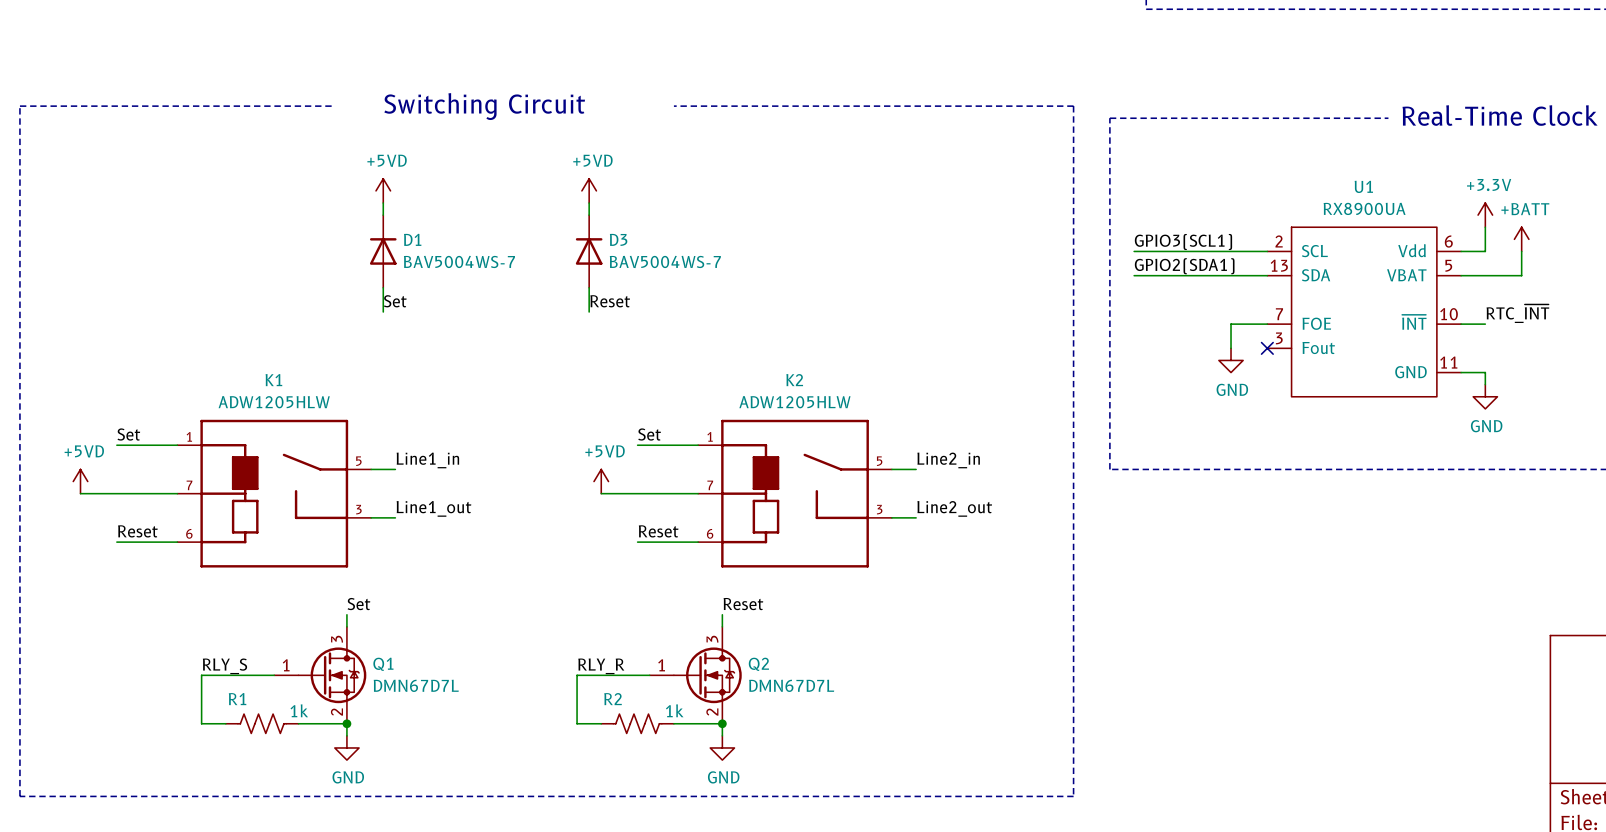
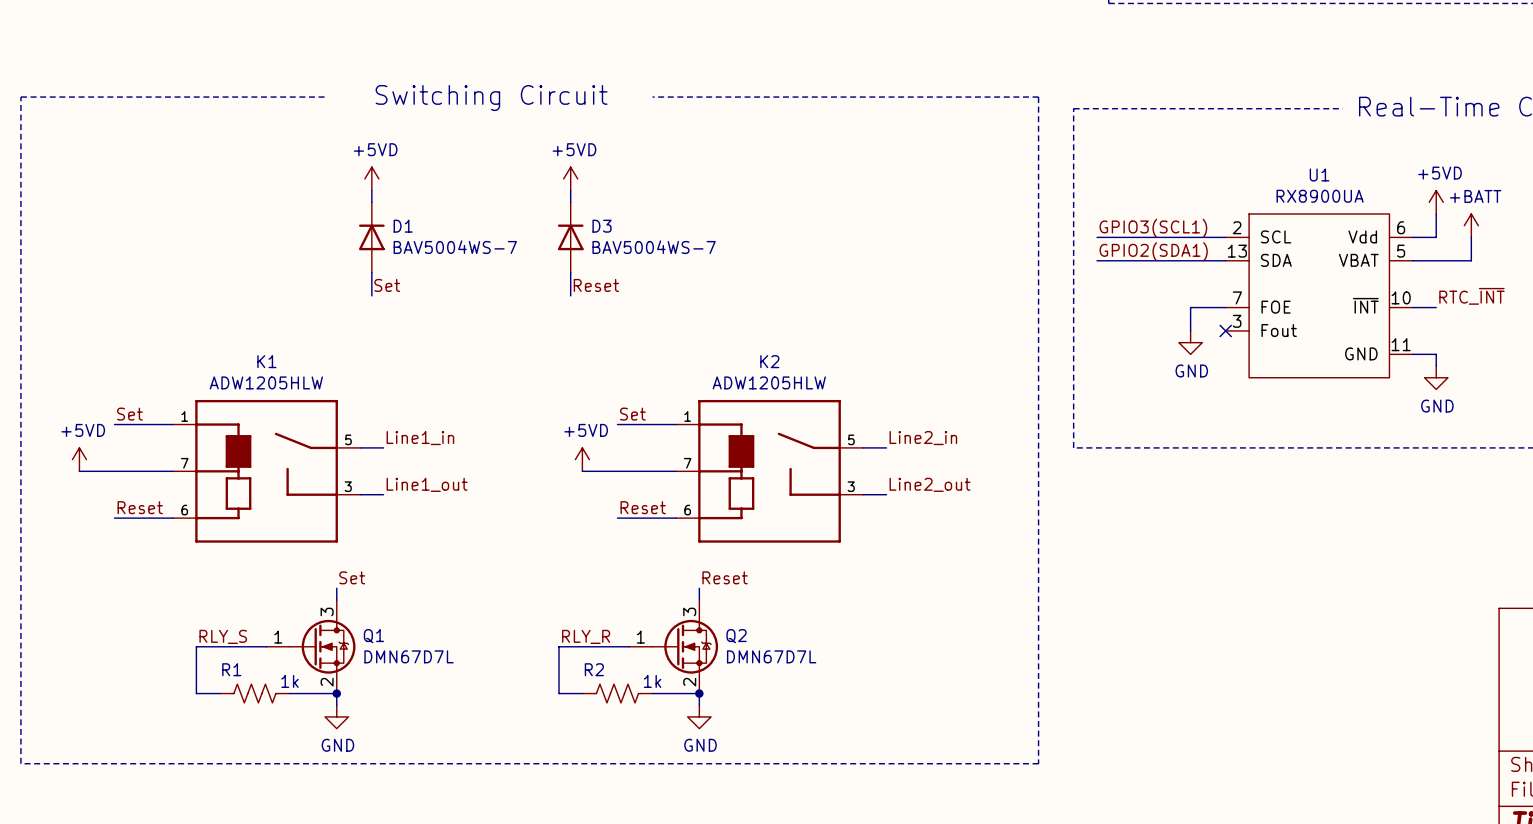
power symbol: +3.3V (1485, 215) -> +5VD (1436, 202)

